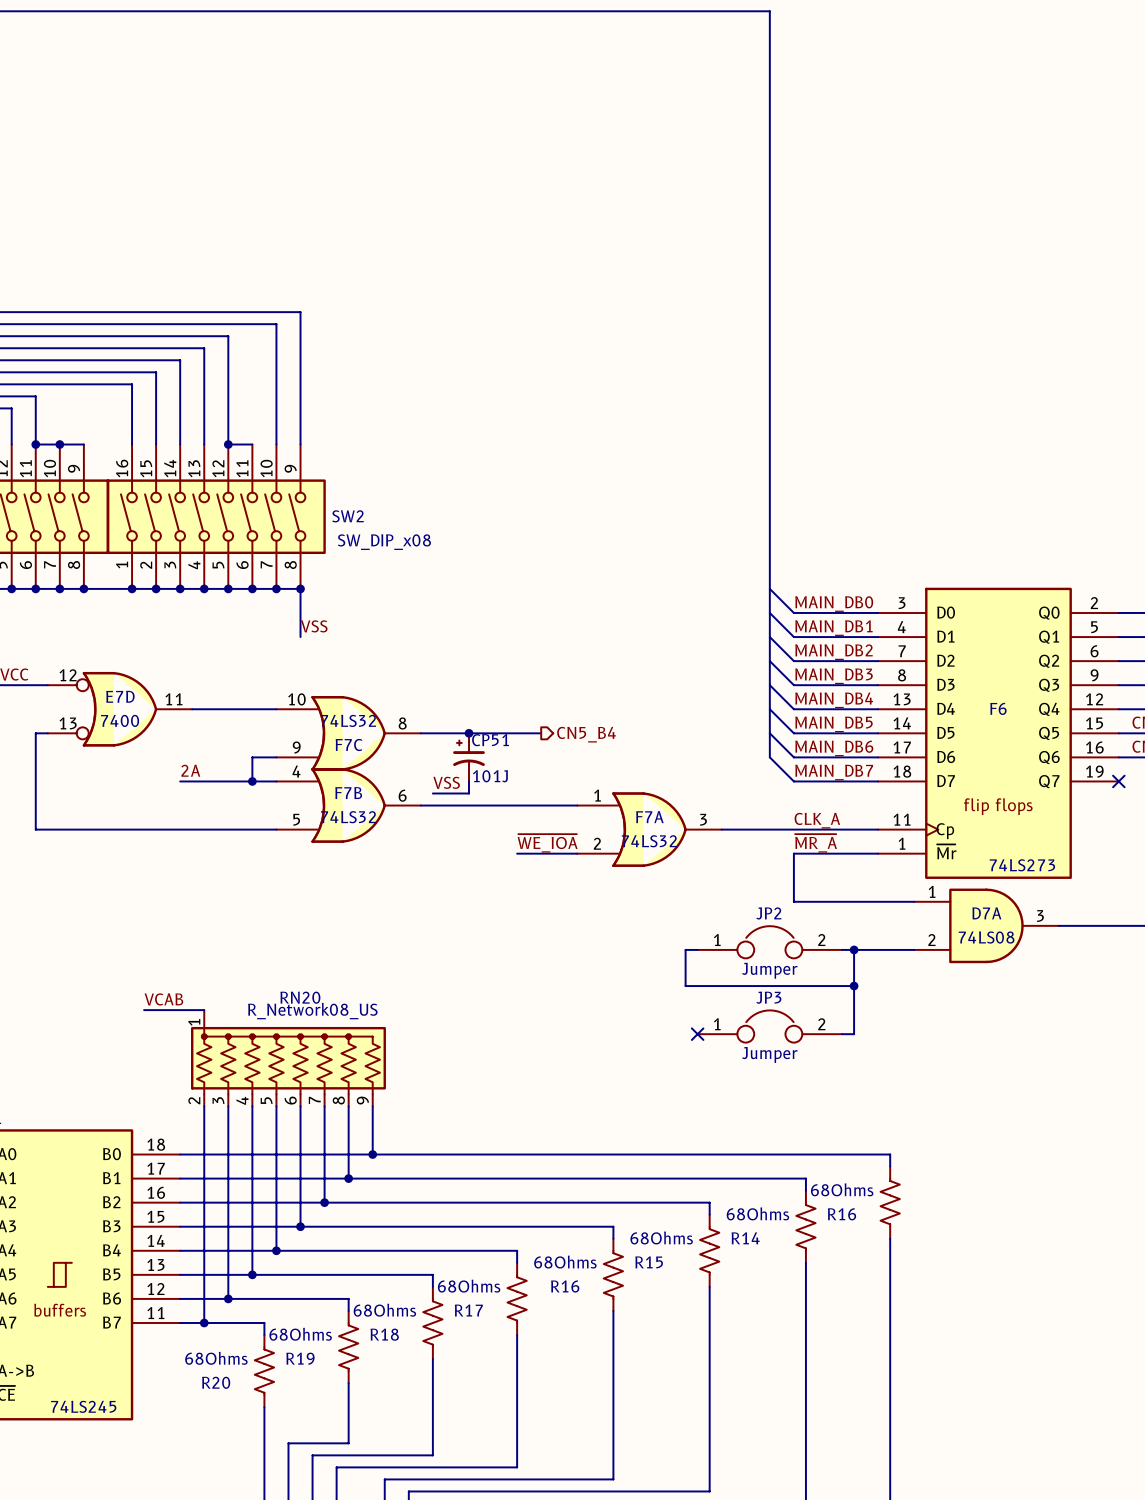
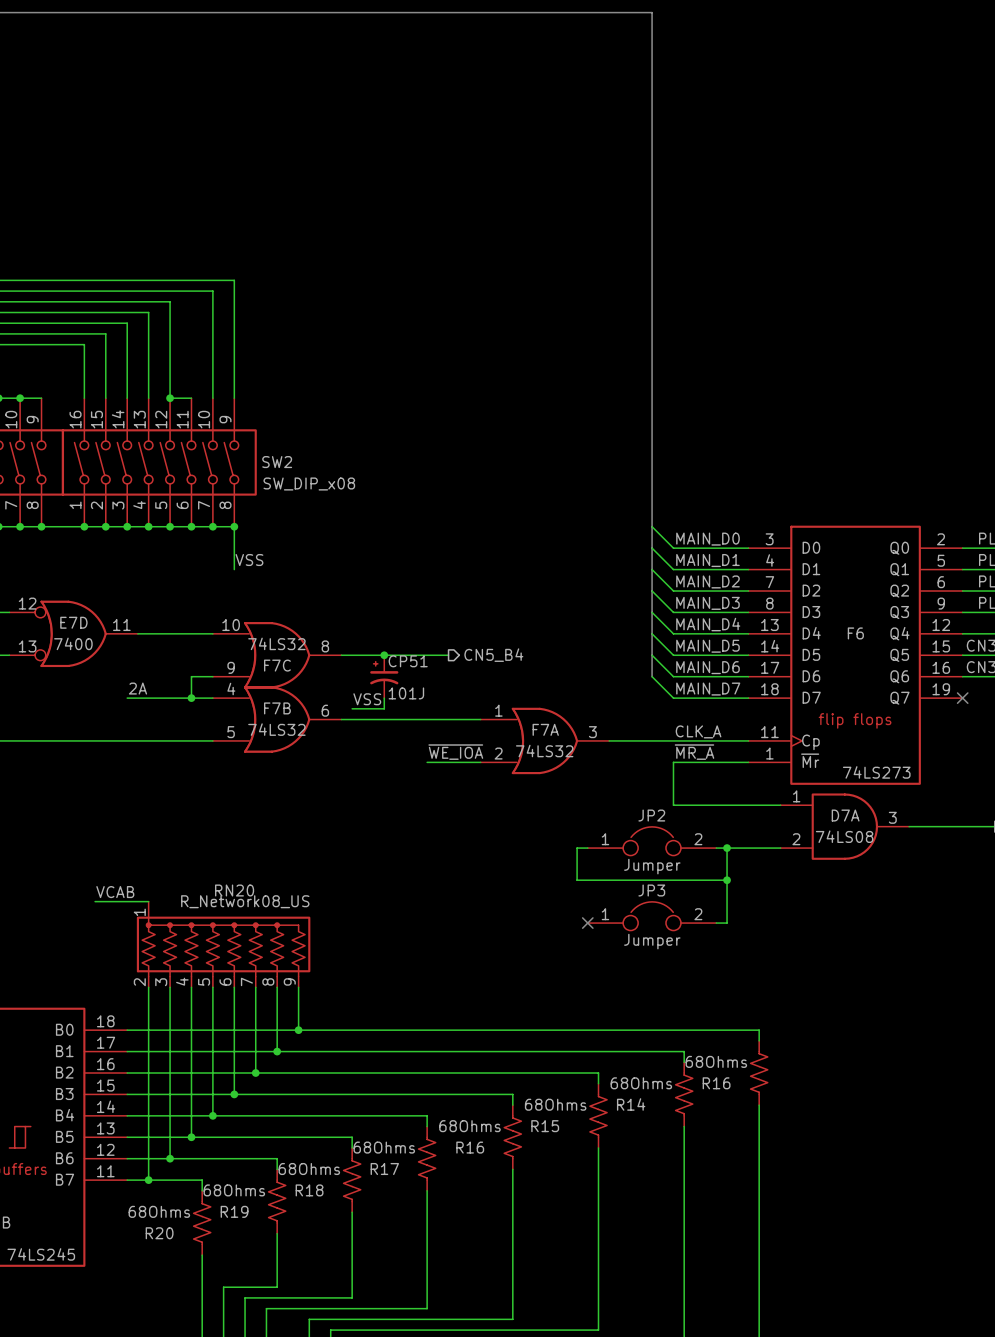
label: MAIN_DB0 (834, 604) -> MAIN_D0 (707, 539)
label: MAIN_DB1 (833, 628) -> MAIN_D1 (707, 560)
label: MAIN_DB2 (834, 652) -> MAIN_D2 (707, 581)
label: MAIN_DB3 (834, 676) -> MAIN_D3 (707, 603)
label: MAIN_DB4 (834, 700) -> MAIN_D4 (708, 624)
label: MAIN_DB5 (833, 724) -> MAIN_D5 (707, 646)
label: MAIN_DB6 (834, 748) -> MAIN_D6 (707, 667)
label: MAIN_DB7 (834, 772) -> MAIN_D7 (708, 689)

